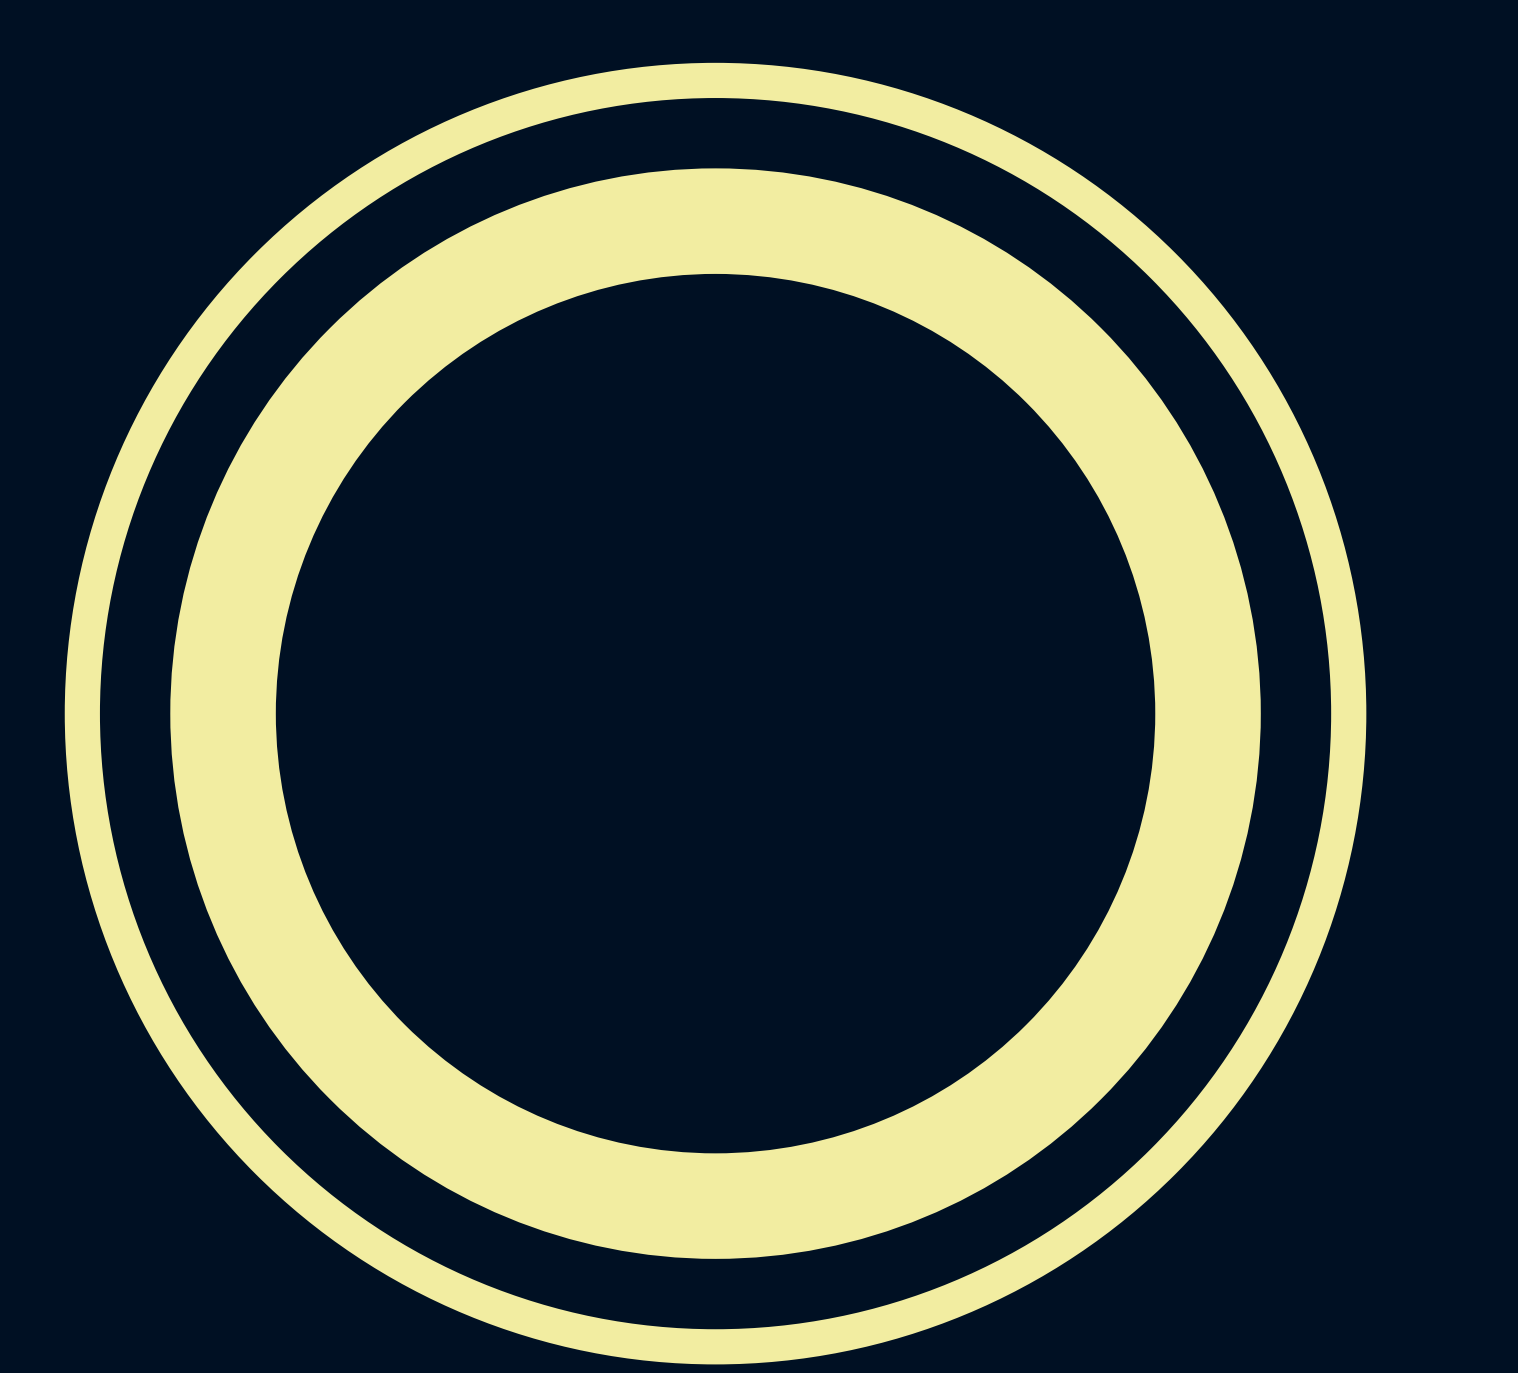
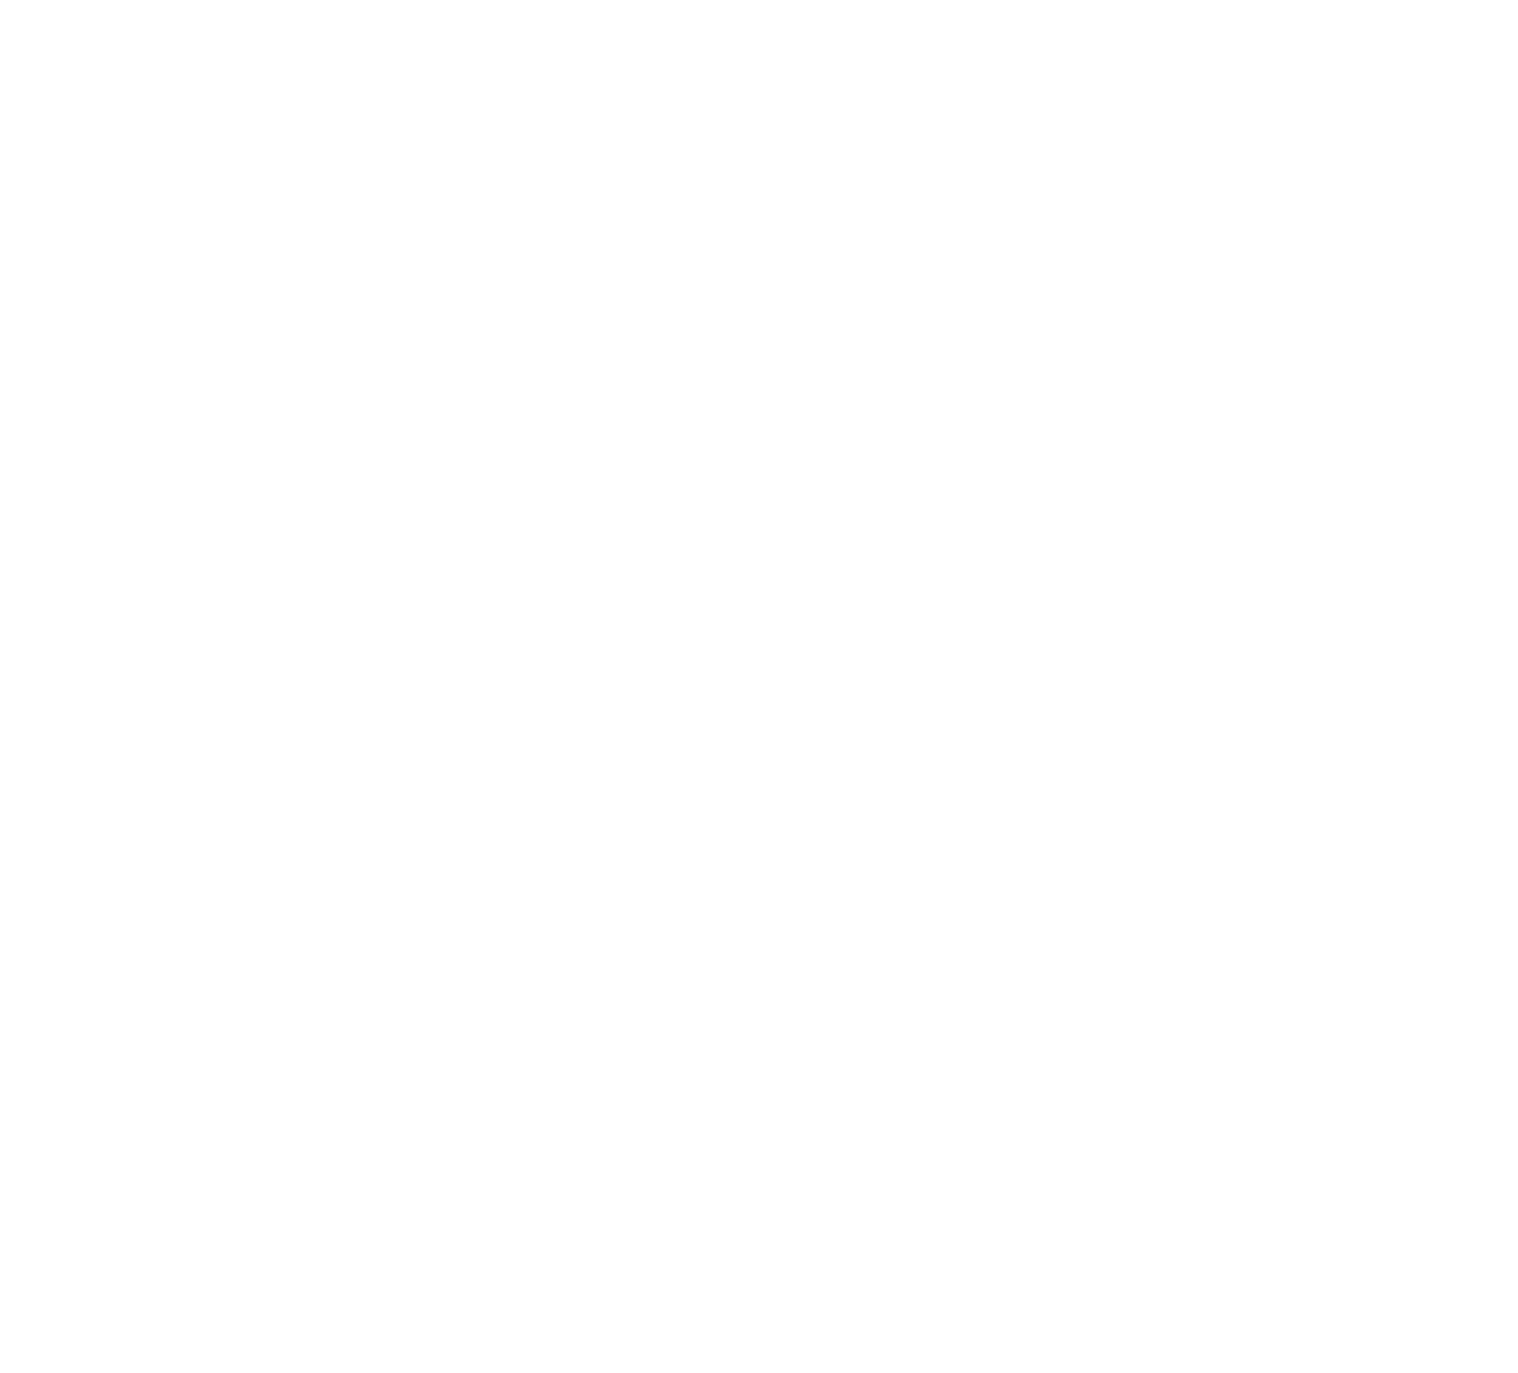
drawing: [64, 62, 1367, 1365] -> none

